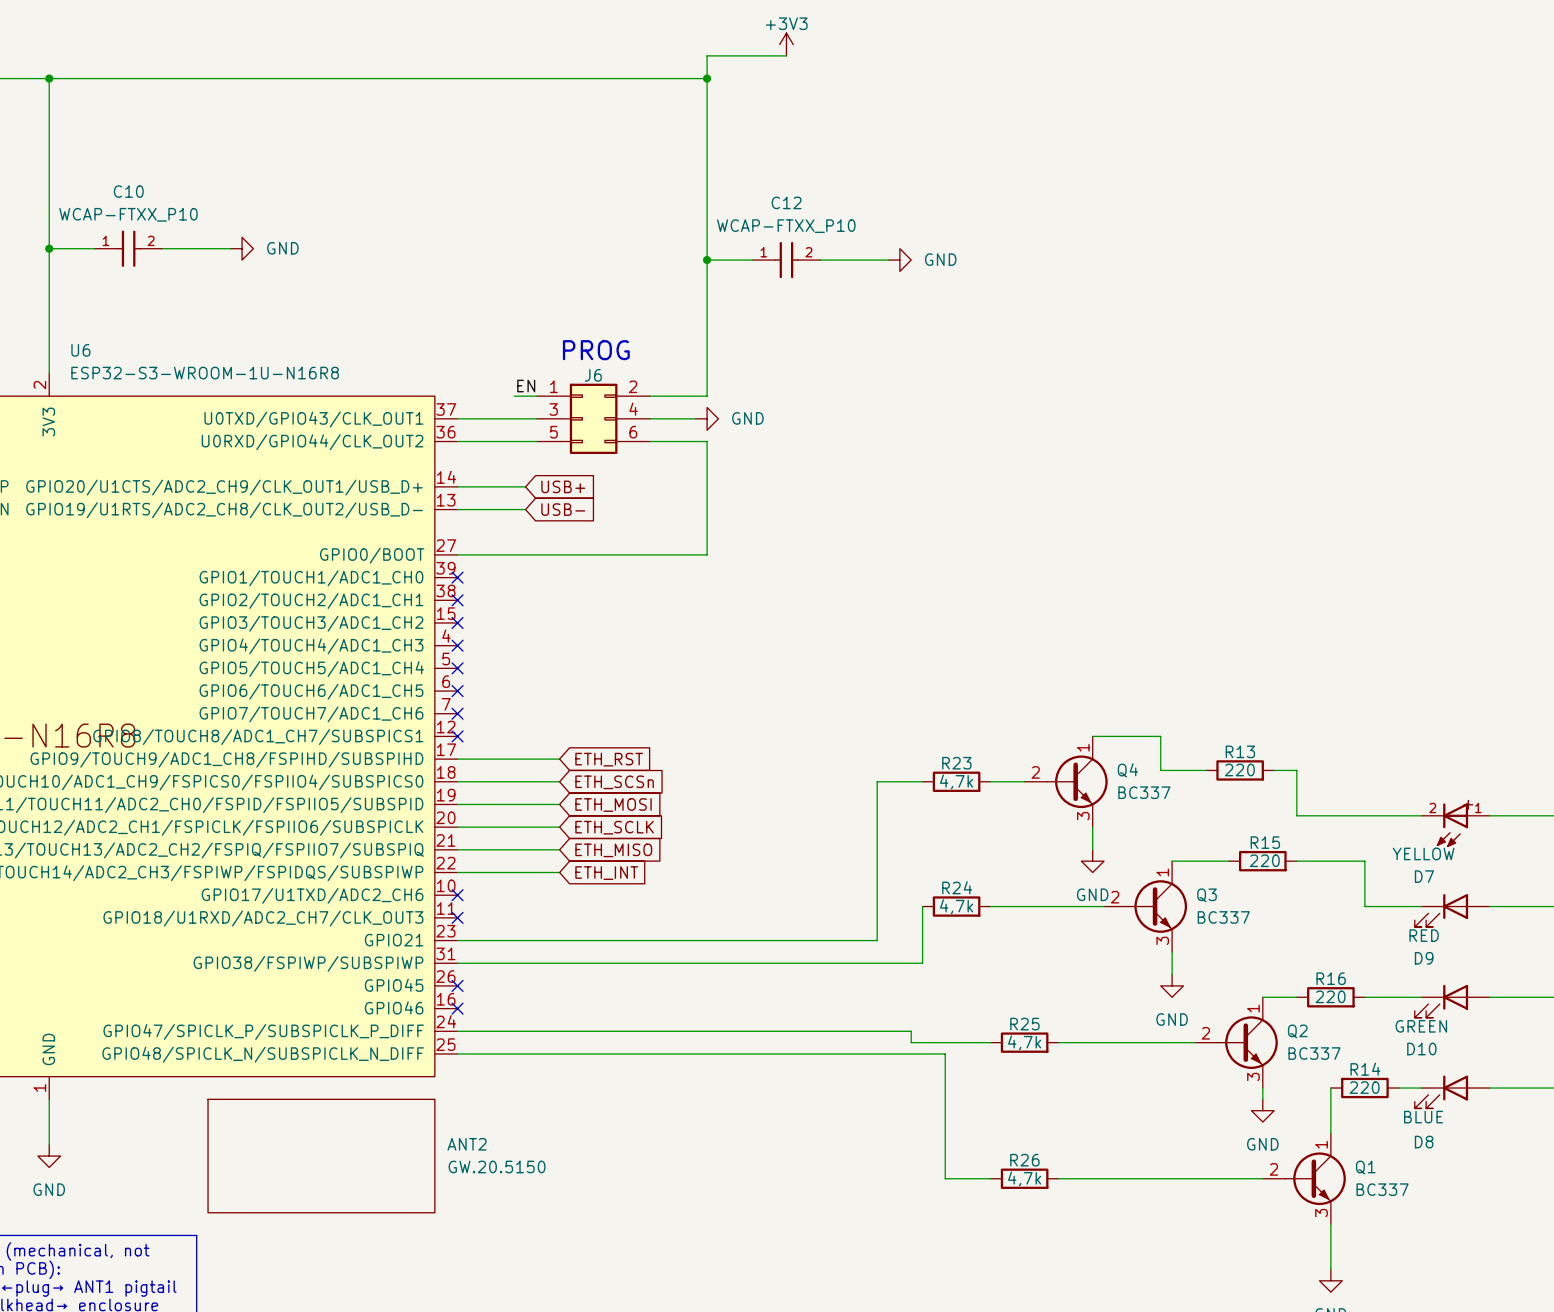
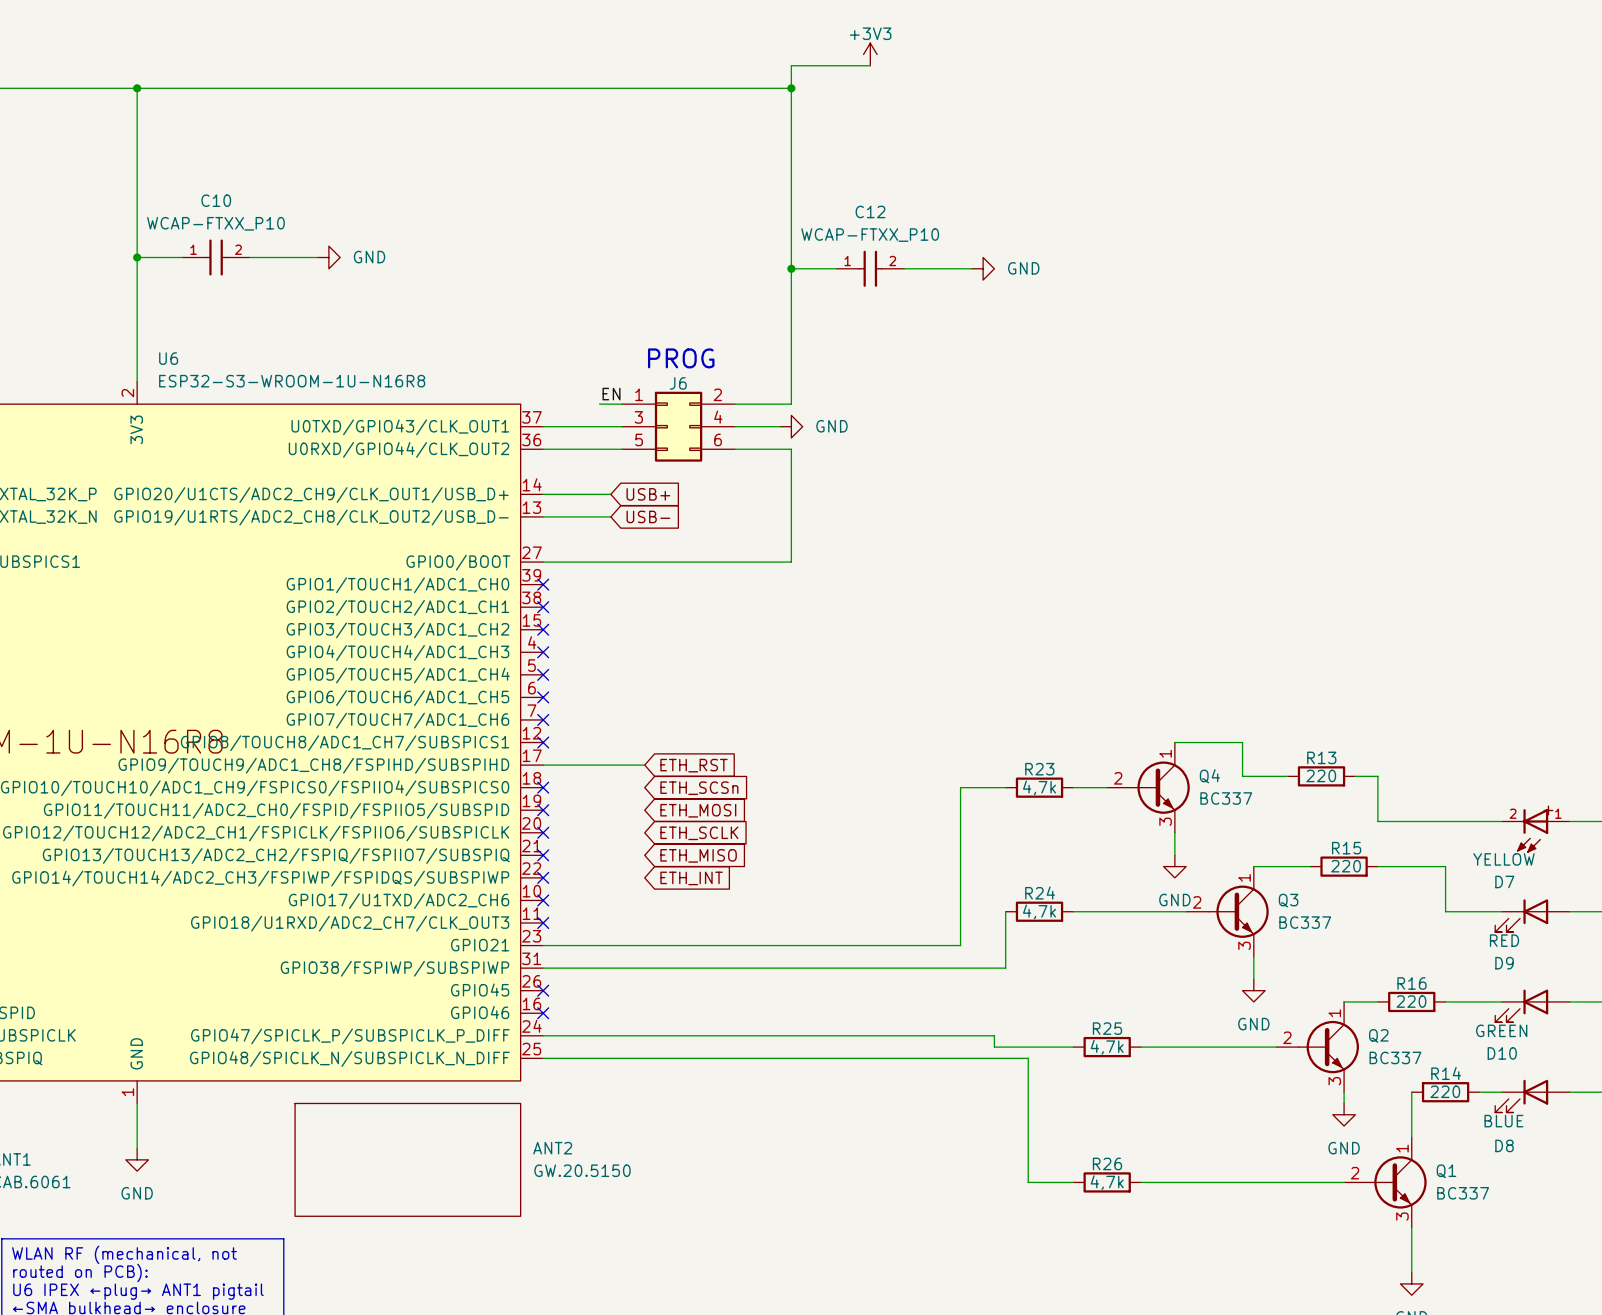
wire: (457, 781) (559, 781) -> none
no-connect mark: none -> (543, 787)
wire: (457, 804) (559, 804) -> none
no-connect mark: none -> (543, 810)
wire: (457, 827) (559, 827) -> none
no-connect mark: none -> (543, 832)
wire: (457, 849) (559, 849) -> none
no-connect mark: none -> (543, 855)
wire: (457, 872) (559, 872) -> none
no-connect mark: none -> (543, 877)

